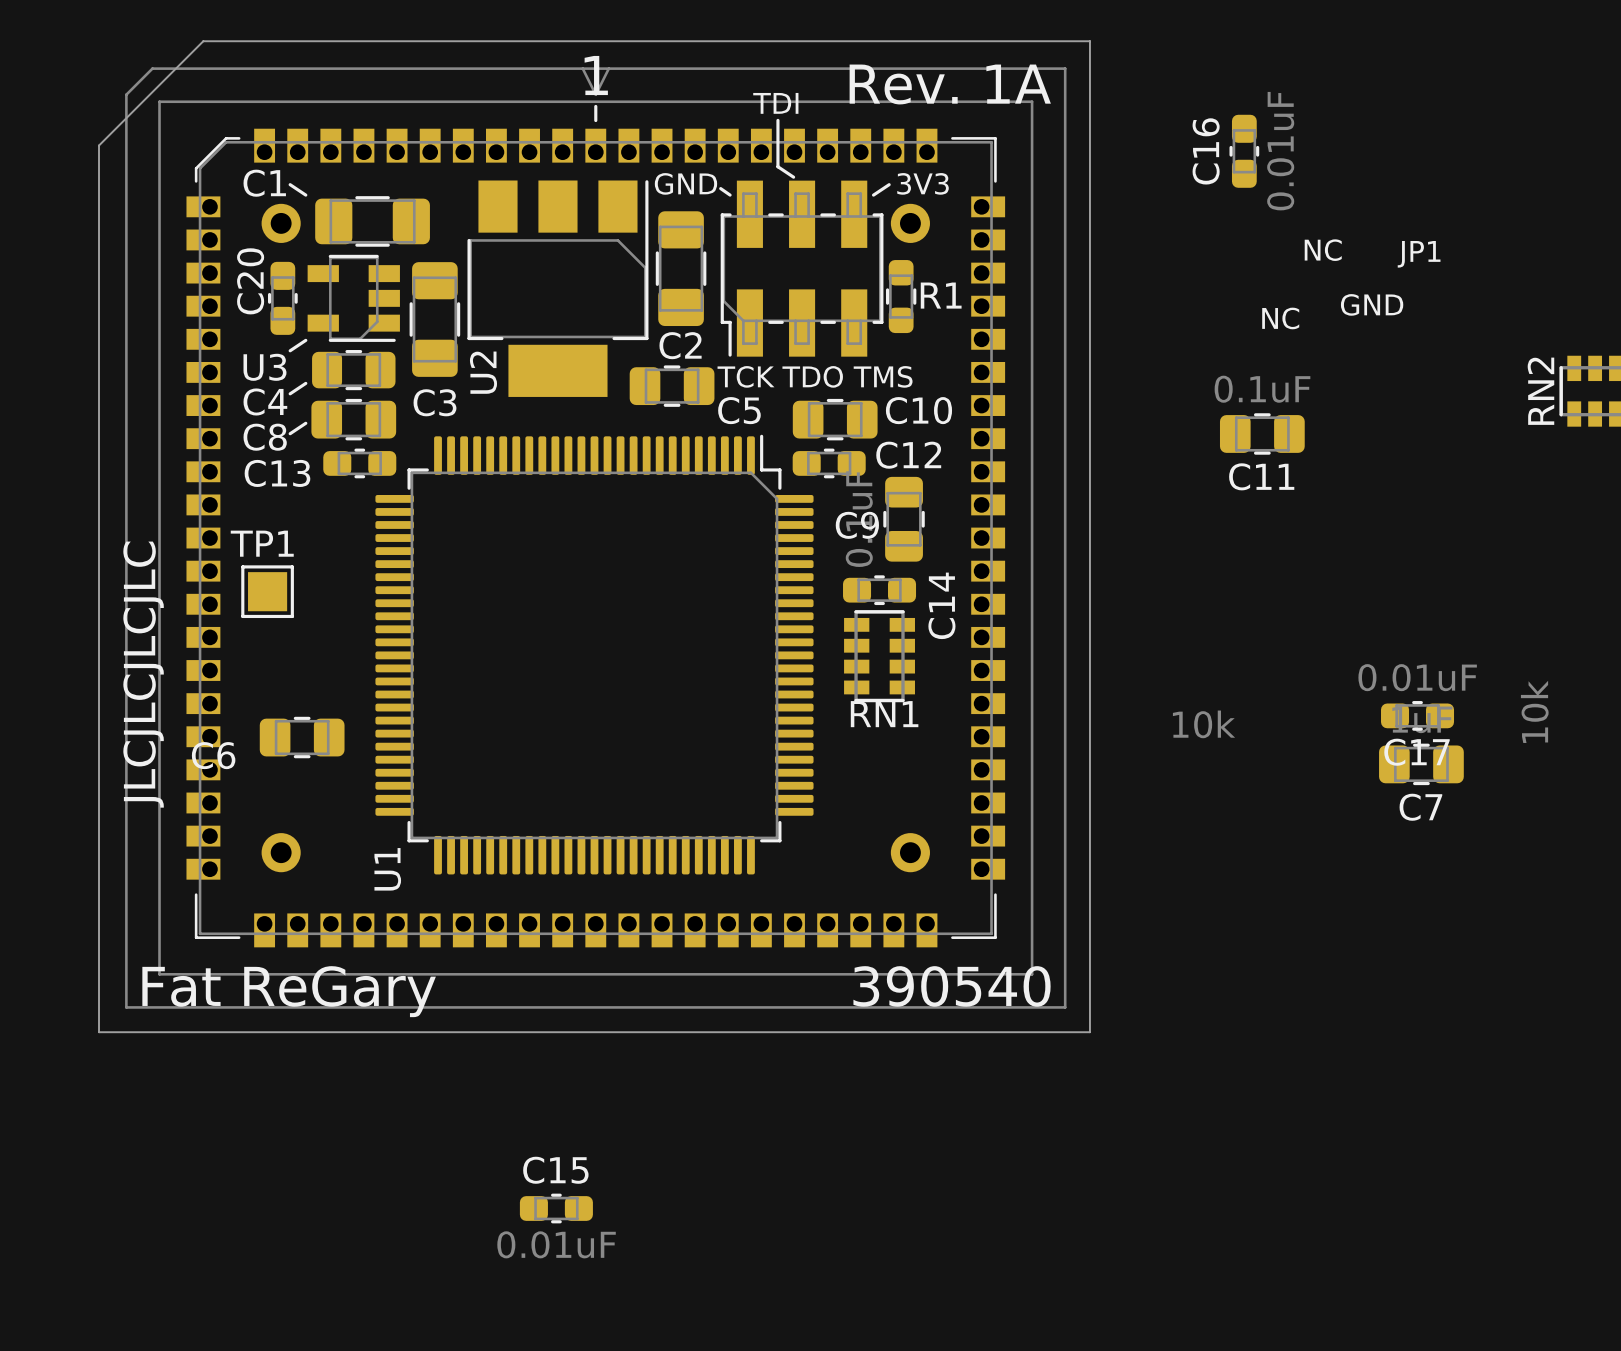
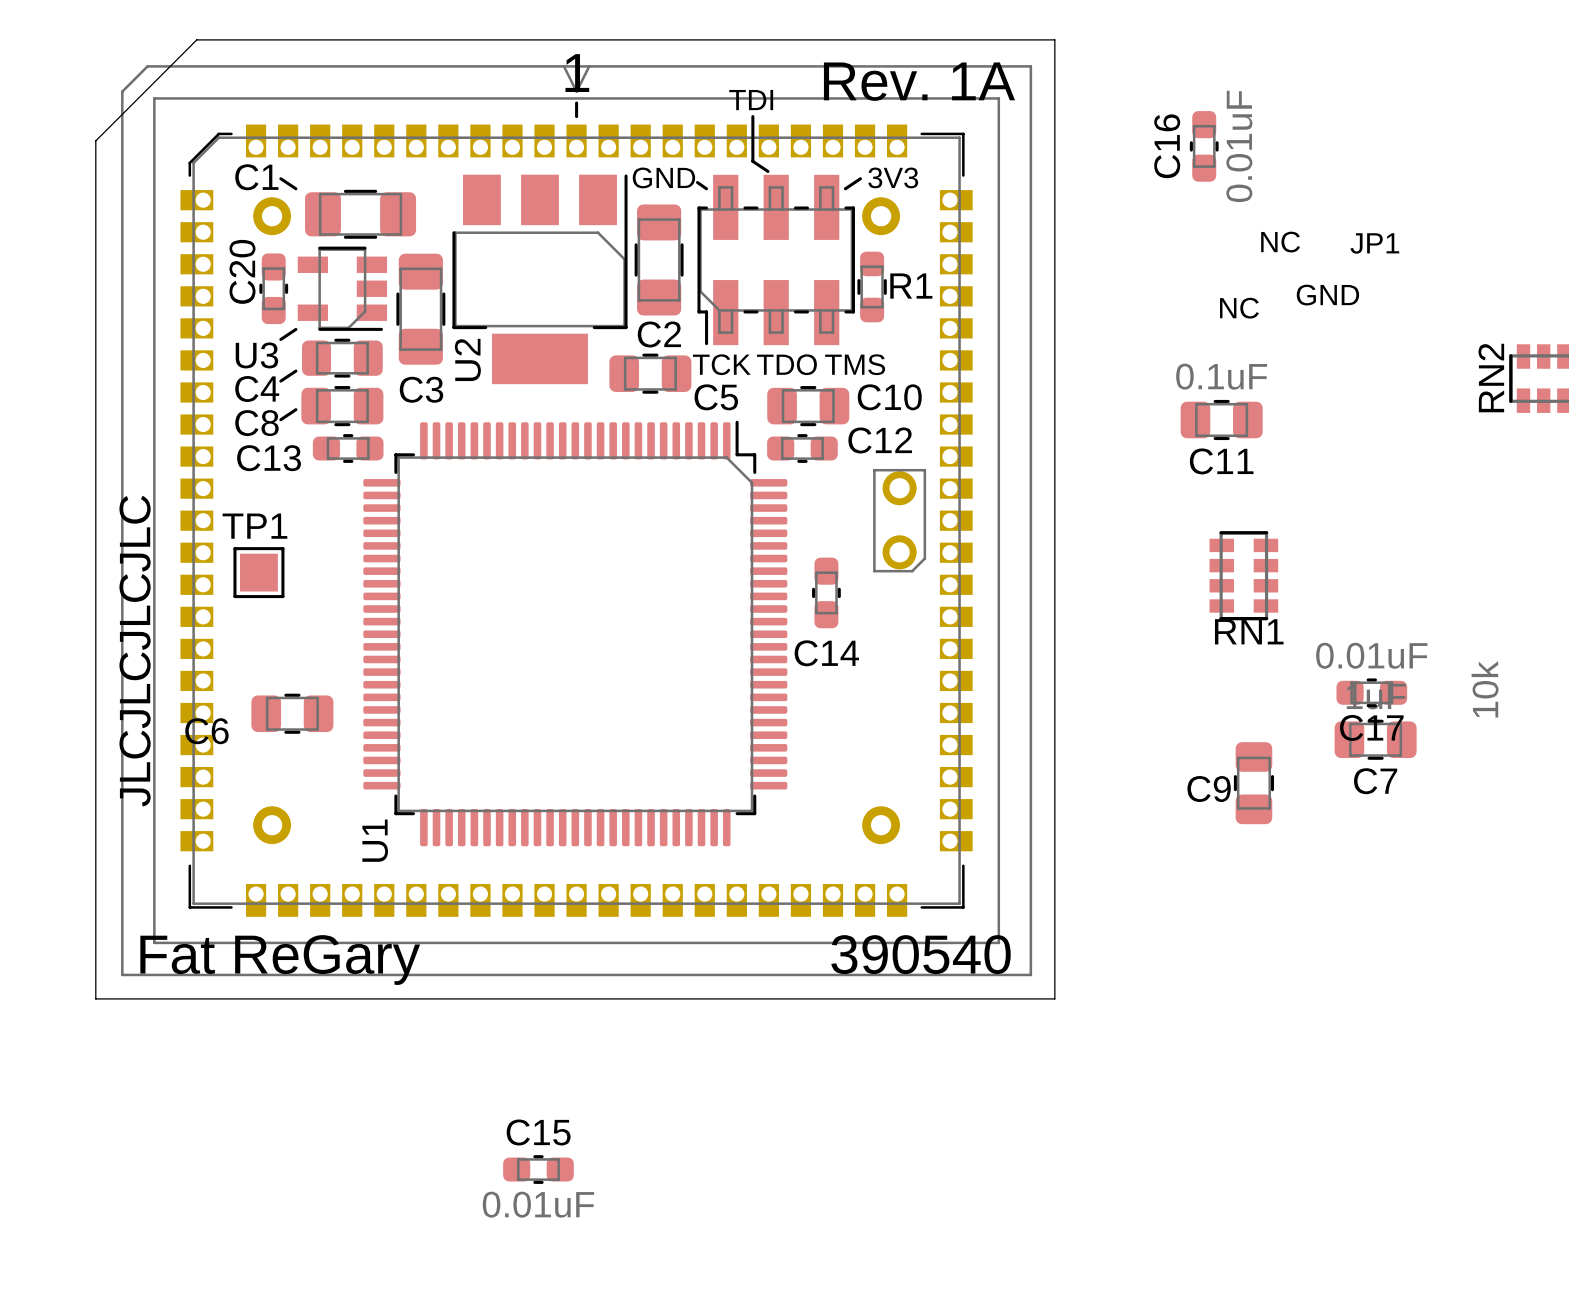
C9 value: 0.1uF (859, 519) -> none
C9 position: (904, 519) -> (1253, 783)
part: none -> (899, 520)
C14 rotation: 0° (879, 590) -> 90° clockwise (826, 592)
RN1 position: (879, 656) -> (1243, 575)
RN1 value: 10k (1204, 724) -> none

